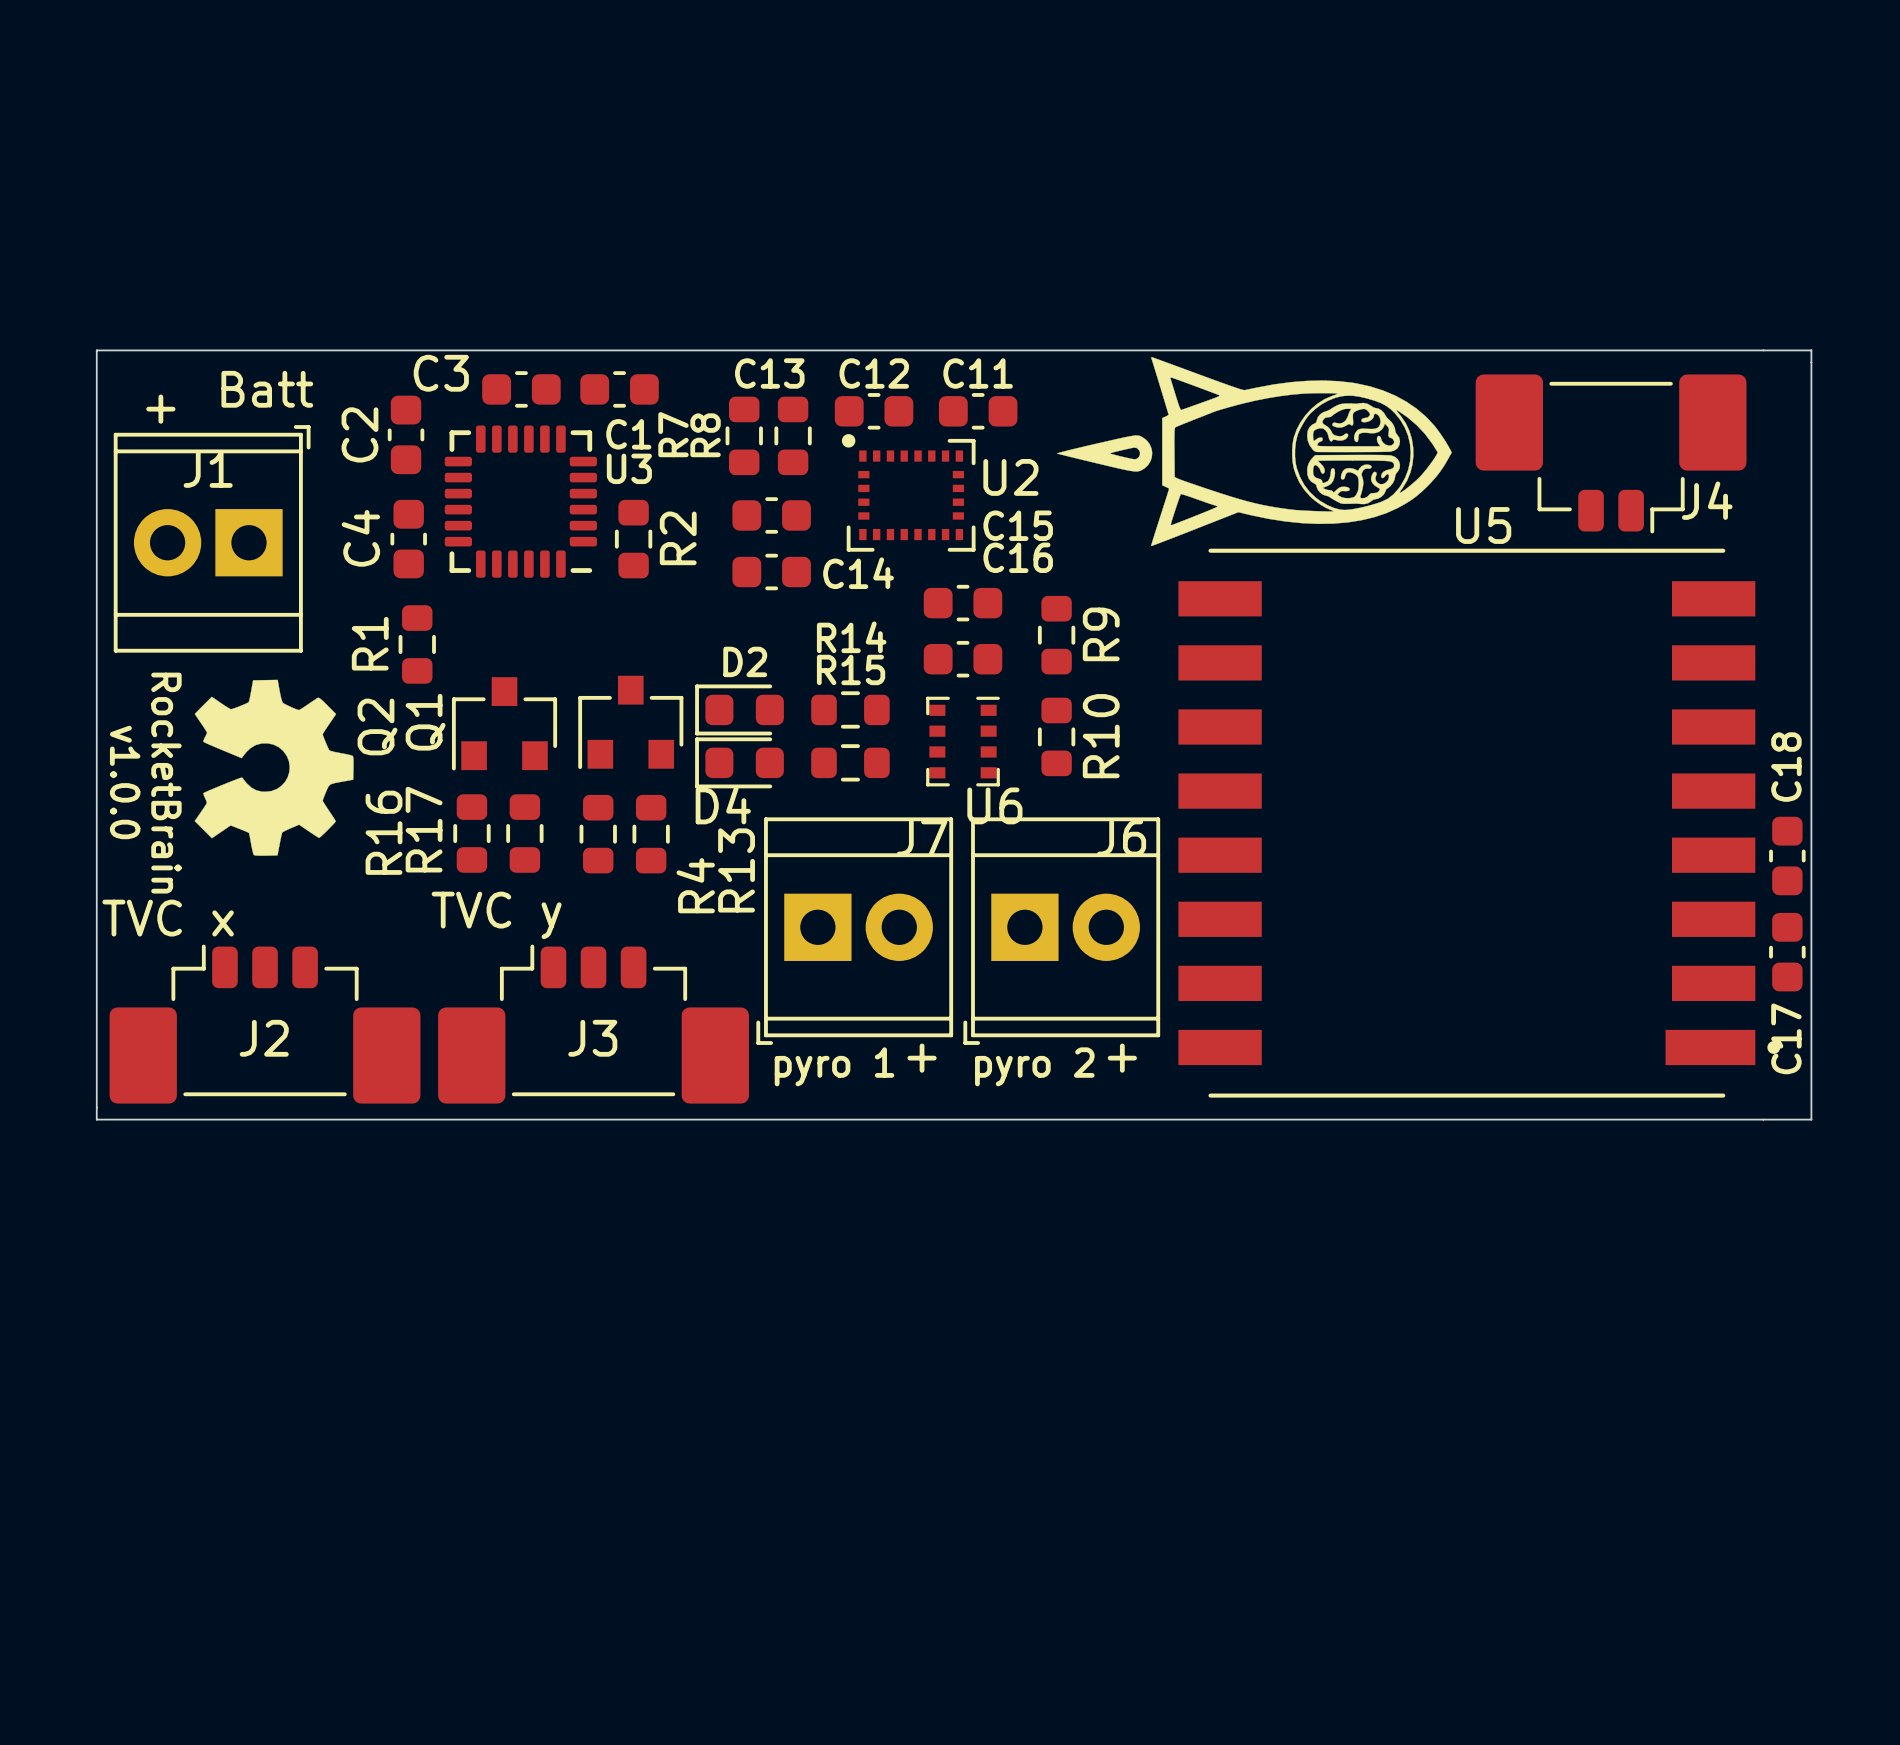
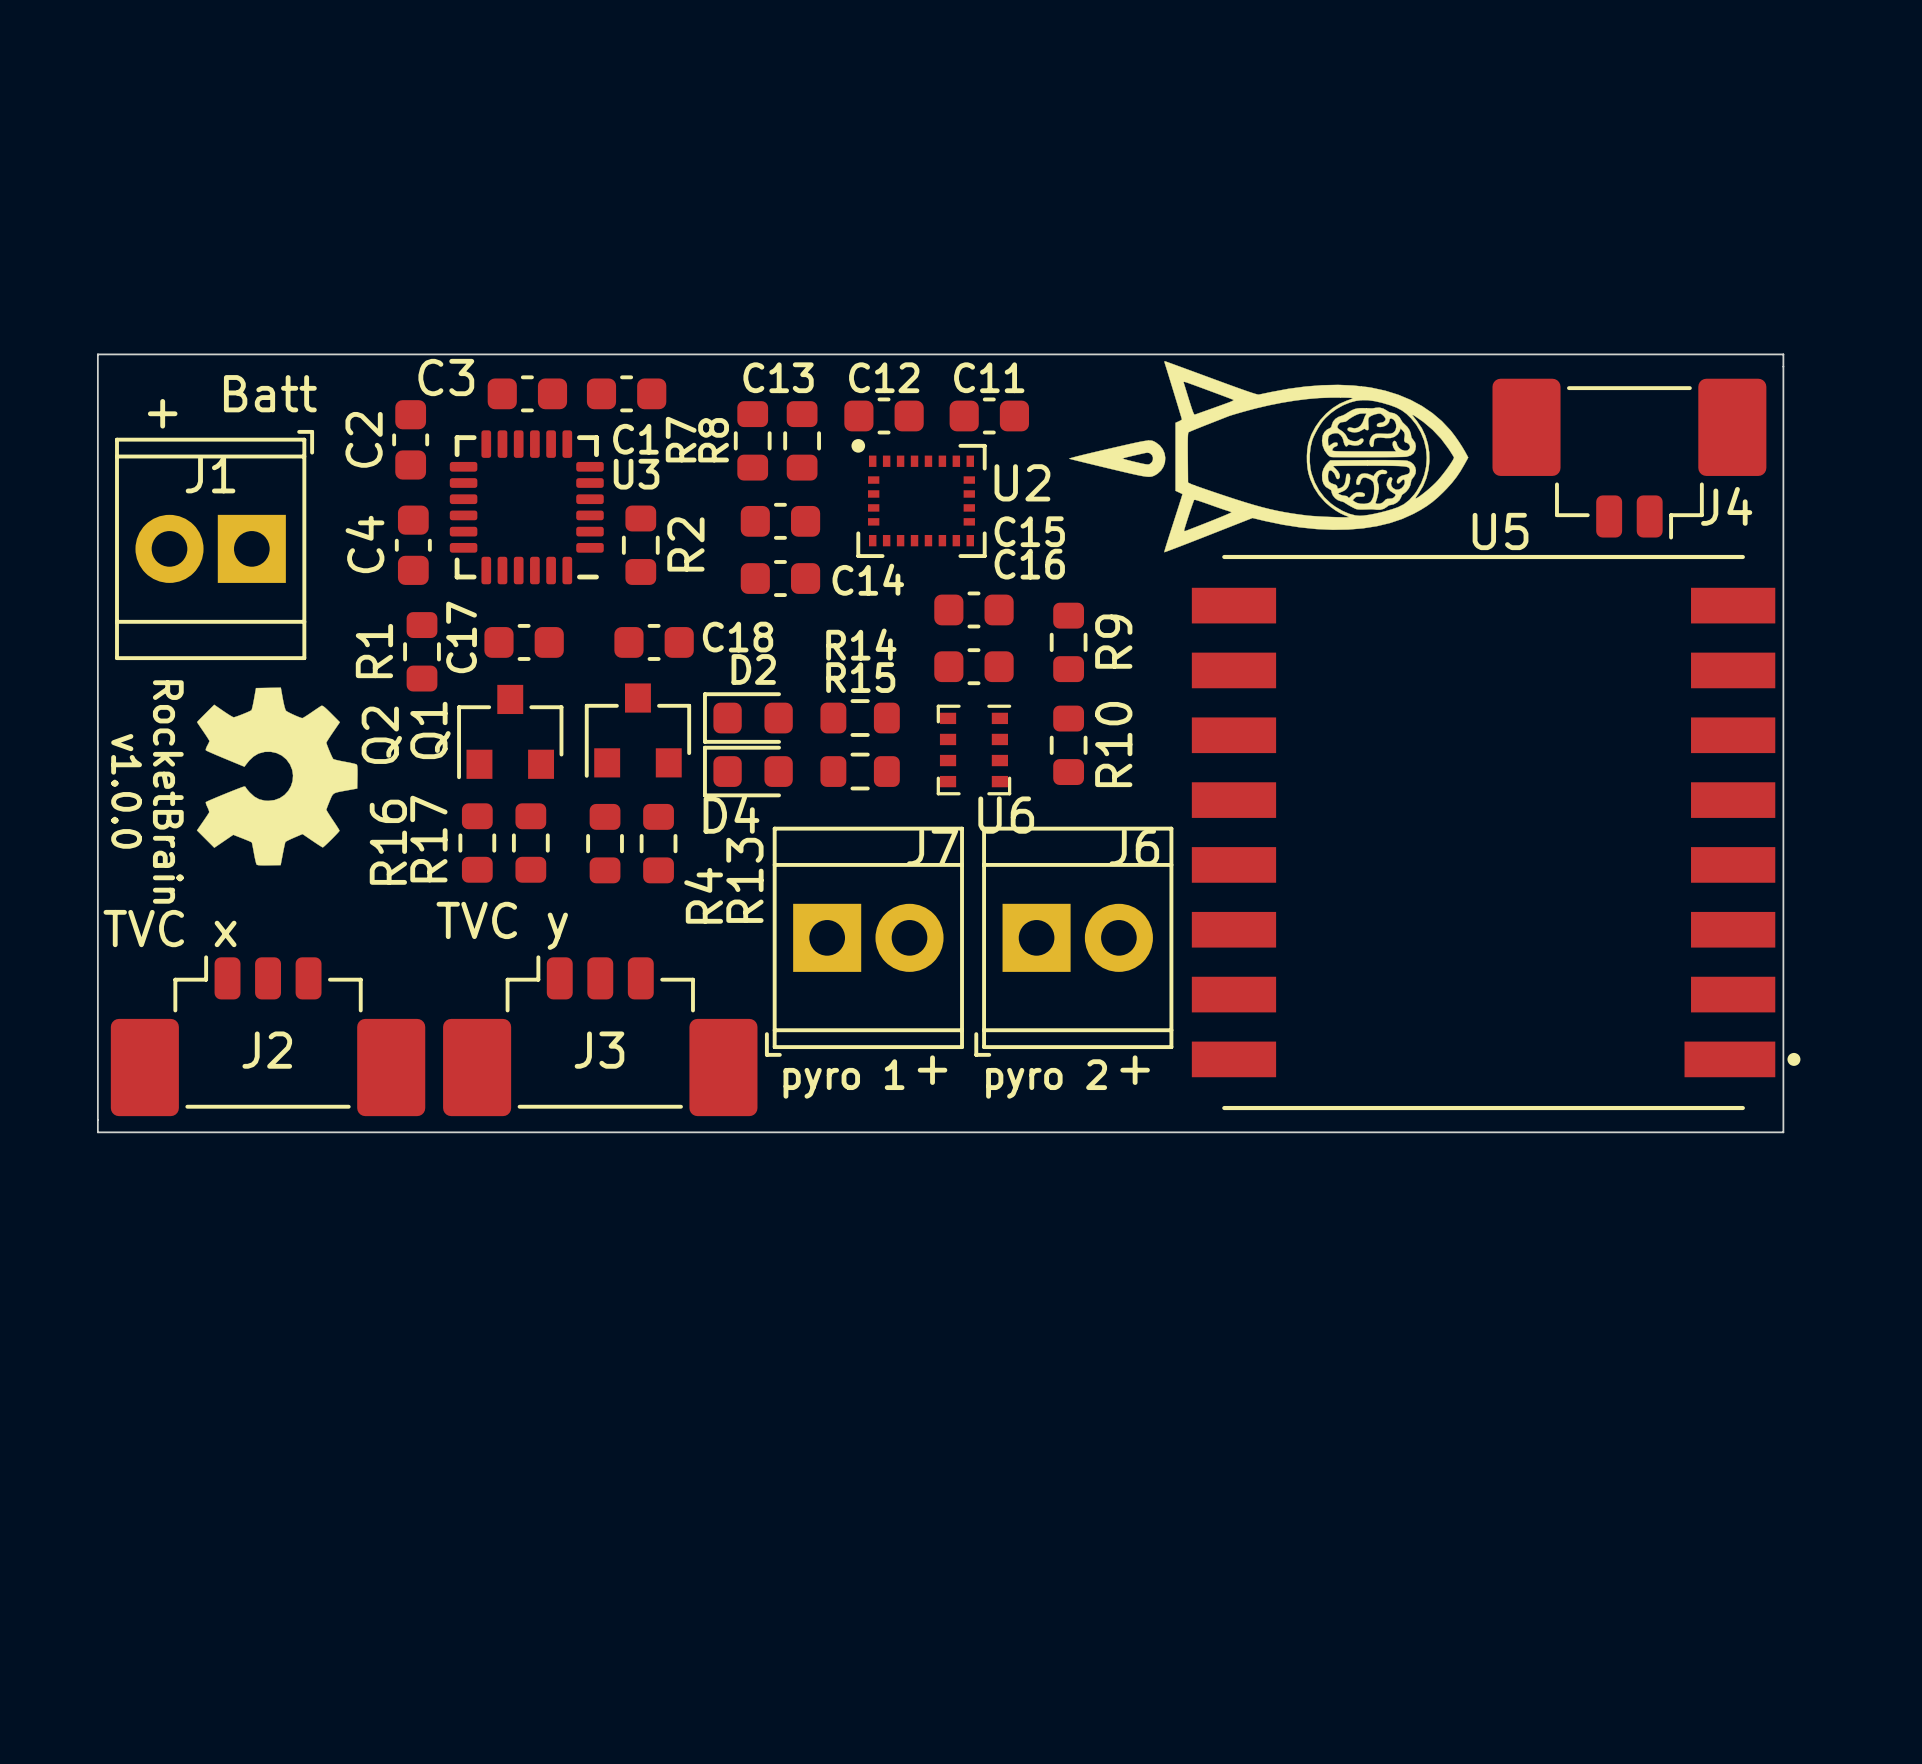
board edge: (1763, 350) (1811, 350) (1811, 1119) (1763, 1119) -> (1783, 354) (1783, 1132)
C18 rotation: 0° (1787, 856) -> 90° clockwise (654, 642)
C18 position: (1787, 856) -> (654, 642)
C17 rotation: 0° (1787, 952) -> 90° clockwise (524, 642)
C17 position: (1787, 952) -> (524, 642)

